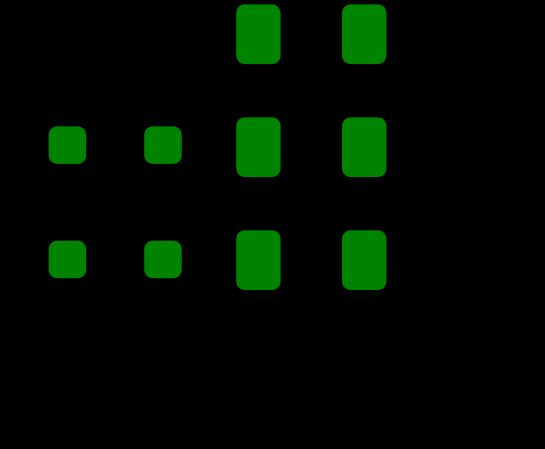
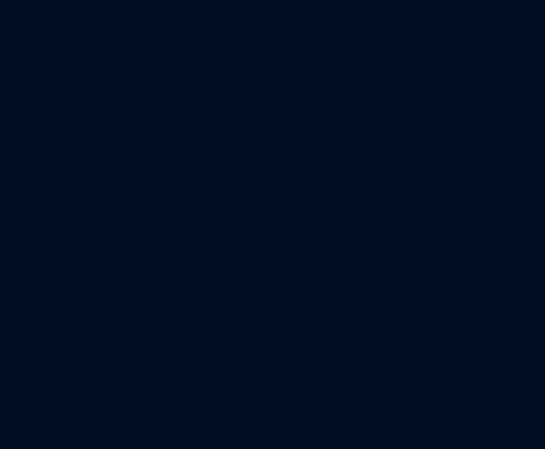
part: (311, 34) -> none
part: (115, 145) -> none
part: (311, 147) -> none
part: (115, 259) -> none
part: (311, 260) -> none

